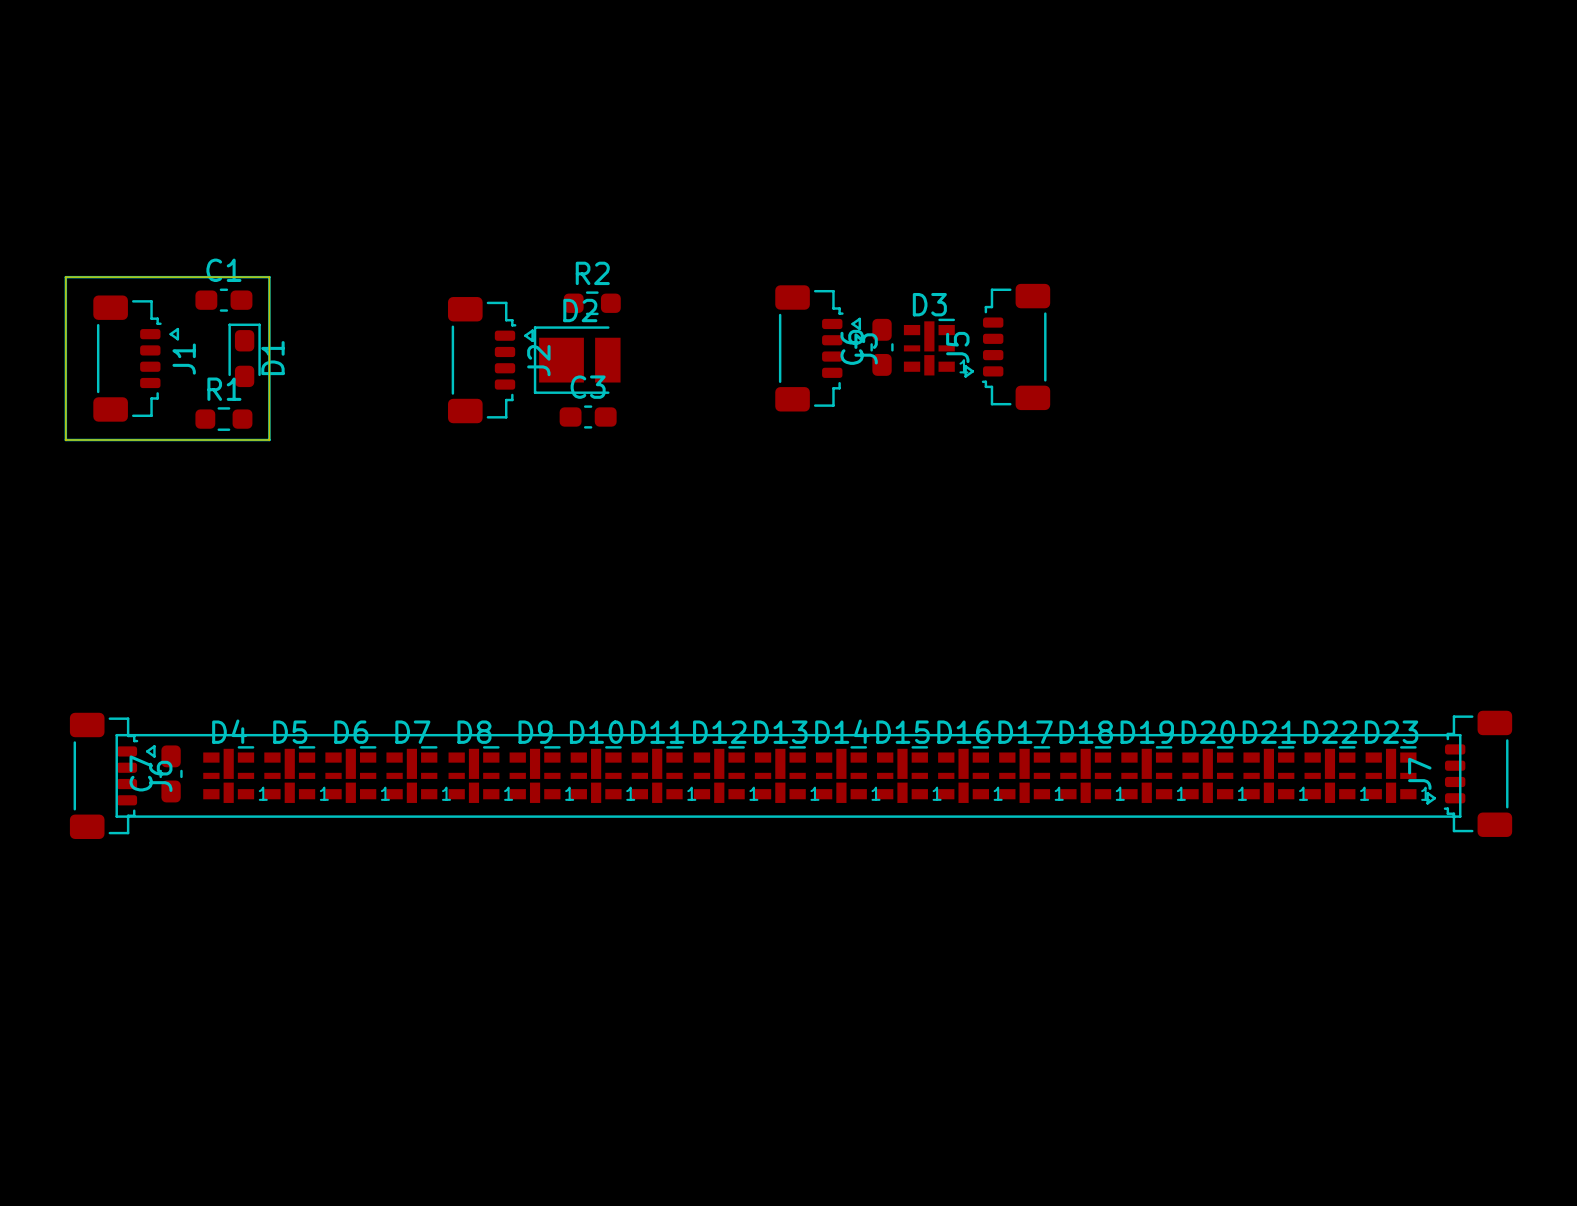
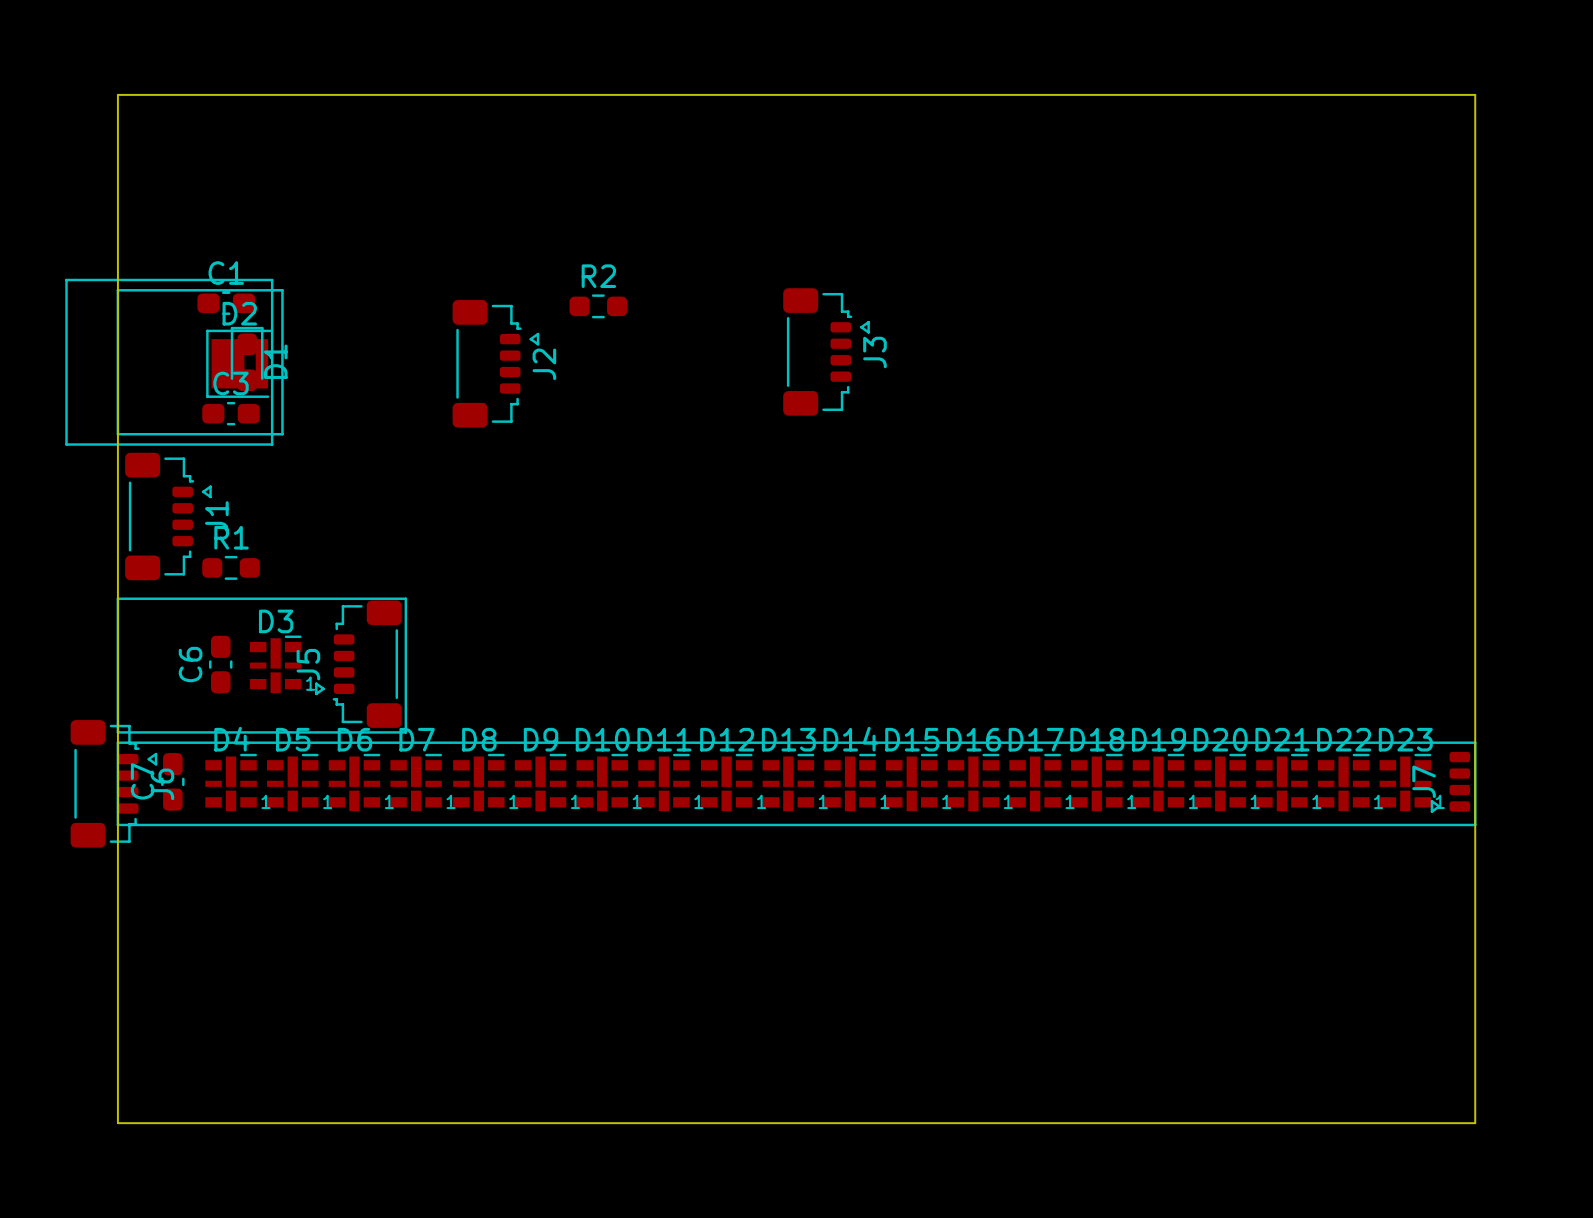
board edge: none -> (117, 94) (1475, 94) (1475, 1123) (117, 1123) (117, 94)
board edge: (65, 277) (269, 277) (269, 440) (65, 440) (65, 277) -> none
line: none -> (117, 290) (117, 434) (282, 434) (282, 290) (117, 290)
D2 footprint: [533, 326, 621, 394] -> [206, 329, 273, 398]
J5 position: (1007, 346) -> (358, 664)
C6 position: (882, 347) -> (220, 664)
D3 position: (929, 347) -> (275, 664)
J1 position: (136, 358) -> (168, 516)
C3 position: (588, 417) -> (231, 413)
R1 position: (223, 419) -> (231, 567)
line: none -> (117, 598) (405, 598) (405, 732) (117, 732) (117, 598)
J7 footprint: [1426, 710, 1513, 837] -> [1430, 751, 1471, 813]

